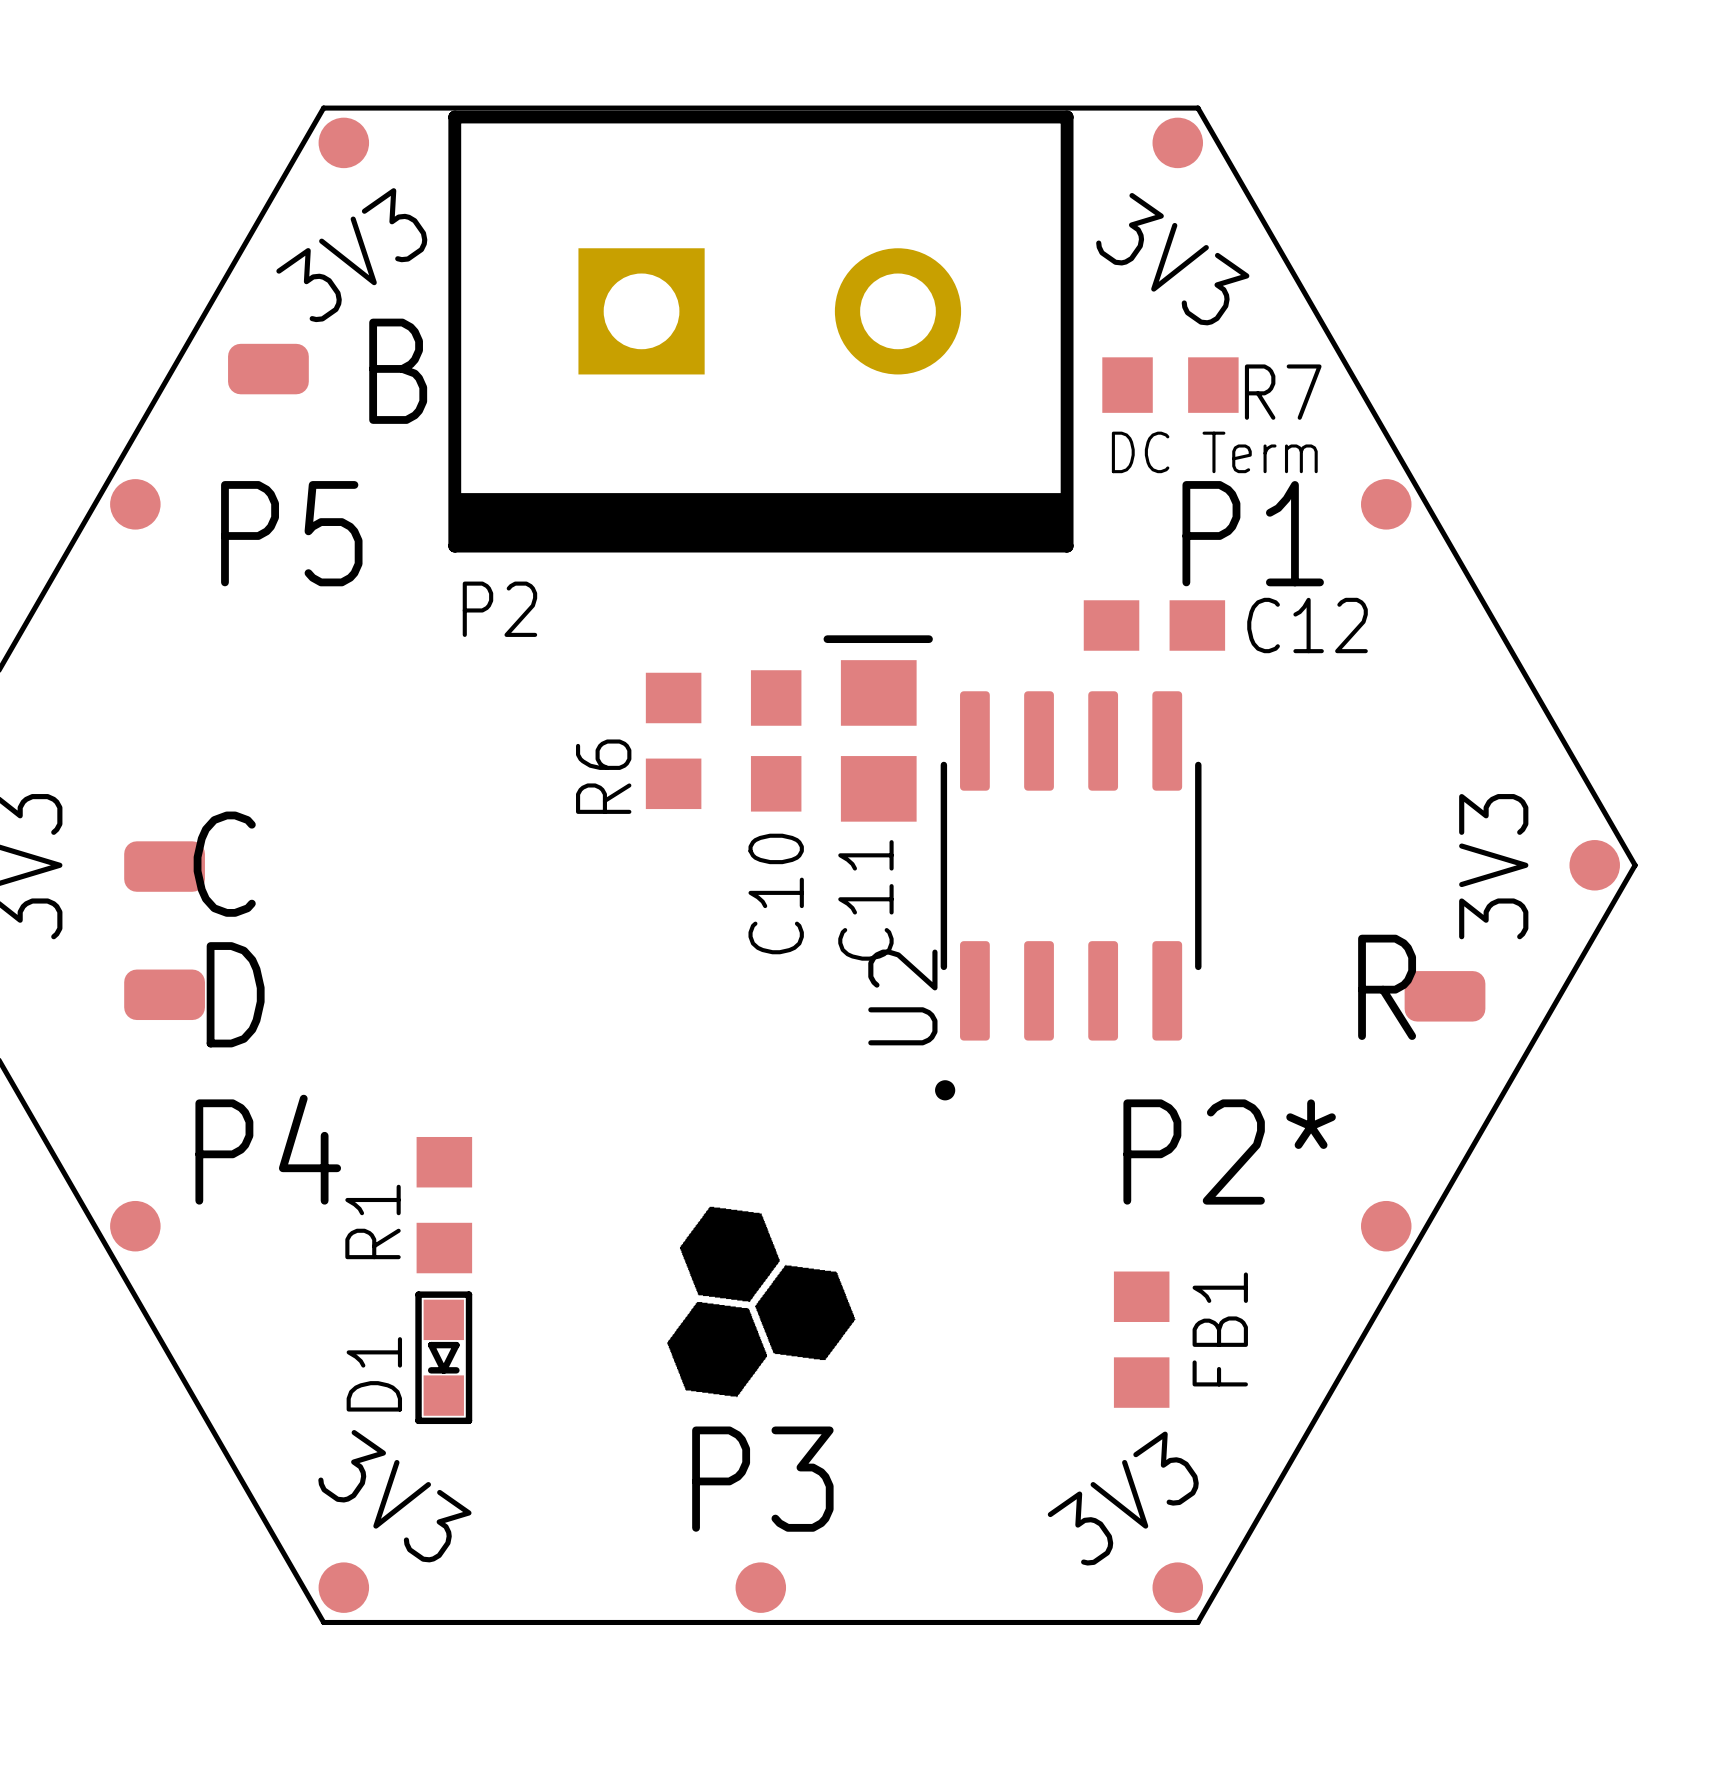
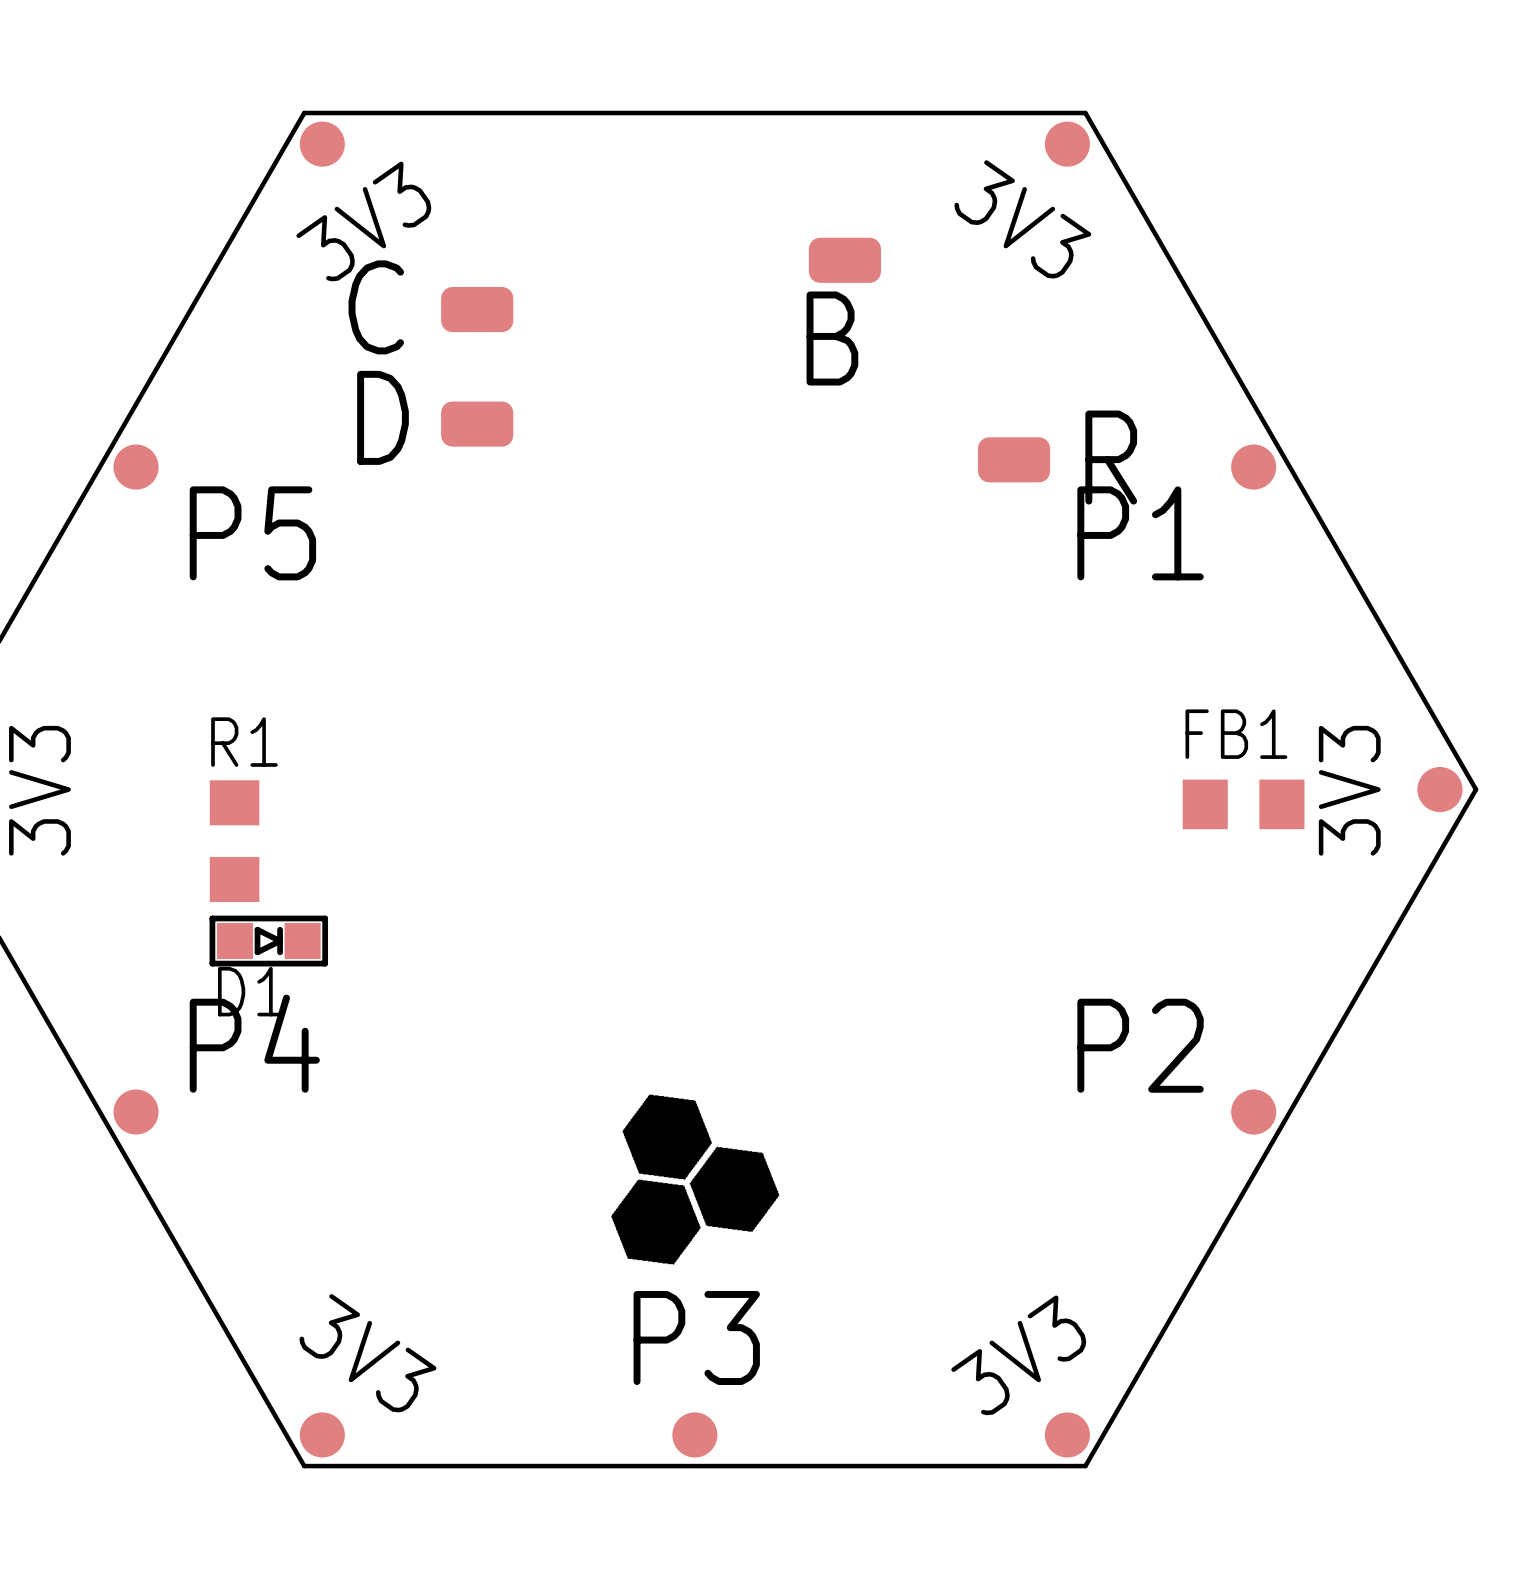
text position: 3V3 (351, 255) -> 3V3 (363, 221)
text position: 3V3 (1172, 259) -> 3V3 (1022, 219)
P2: (760, 331) -> none
B position: (268, 369) -> (844, 260)
B name position: B (398, 371) -> B (832, 338)
R7: (1170, 385) -> none
text: DC Term (1214, 452) -> none
text position: P5 (291, 533) -> P5 (252, 533)
text position: P1 (1253, 533) -> P1 (1140, 533)
C12: (1154, 625) -> none
C11: (878, 728) -> none
R6: (673, 740) -> none
C10: (776, 740) -> none
C name position: C (224, 864) -> C (376, 307)
C position: (164, 866) -> (477, 309)
U2: (1068, 895) -> none
R name position: R (1387, 987) -> R (1111, 457)
D position: (164, 994) -> (477, 424)
D name position: D (235, 994) -> D (382, 417)
R position: (1445, 996) -> (1014, 459)
text: P2* (1229, 1152) -> P2 (1140, 1045)
R1 position: (444, 1205) -> (234, 841)
R1 name rotation: 0° (373, 1221) -> 90° clockwise (244, 742)
R1 name position: R1 (373, 1221) -> R1 (244, 742)
FB1 name position: FB1 (1220, 1329) -> FB1 (1236, 734)
FB1 rotation: 0° (1141, 1339) -> 90° clockwise (1243, 804)
FB1 position: (1141, 1339) -> (1243, 804)
D1 rotation: 0° (443, 1357) -> 90° counterclockwise (268, 941)
D1 position: (443, 1357) -> (268, 941)

